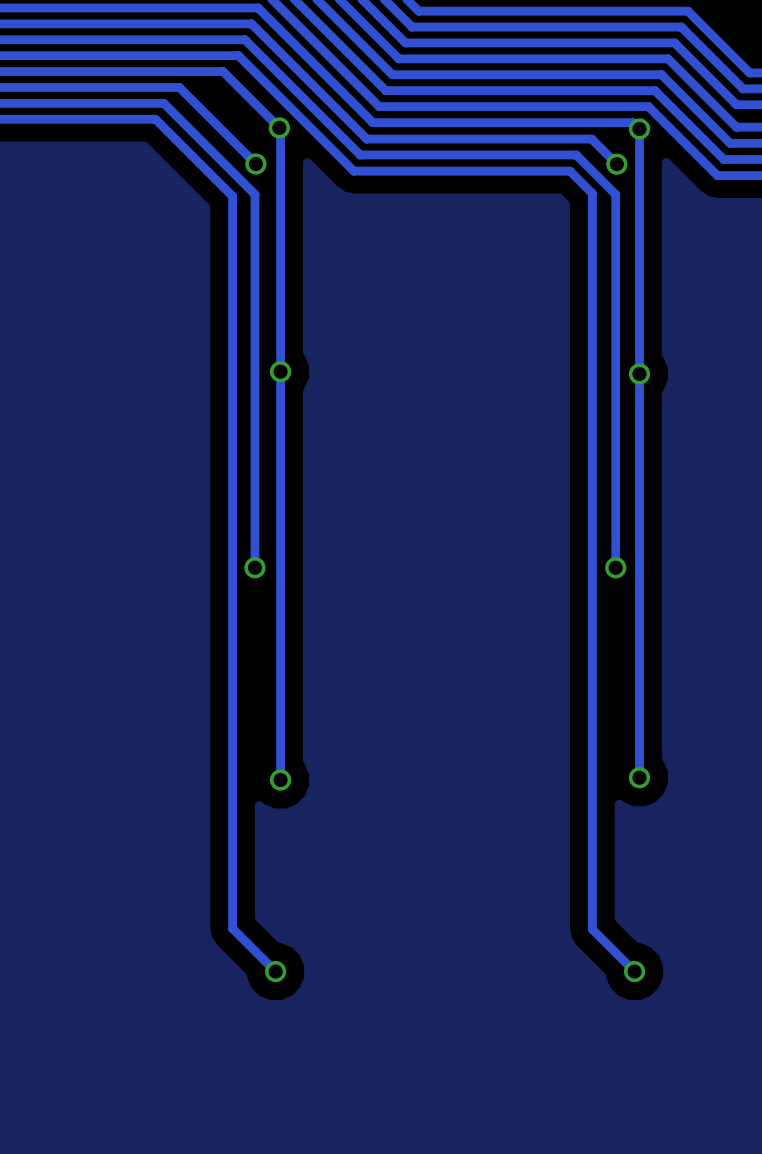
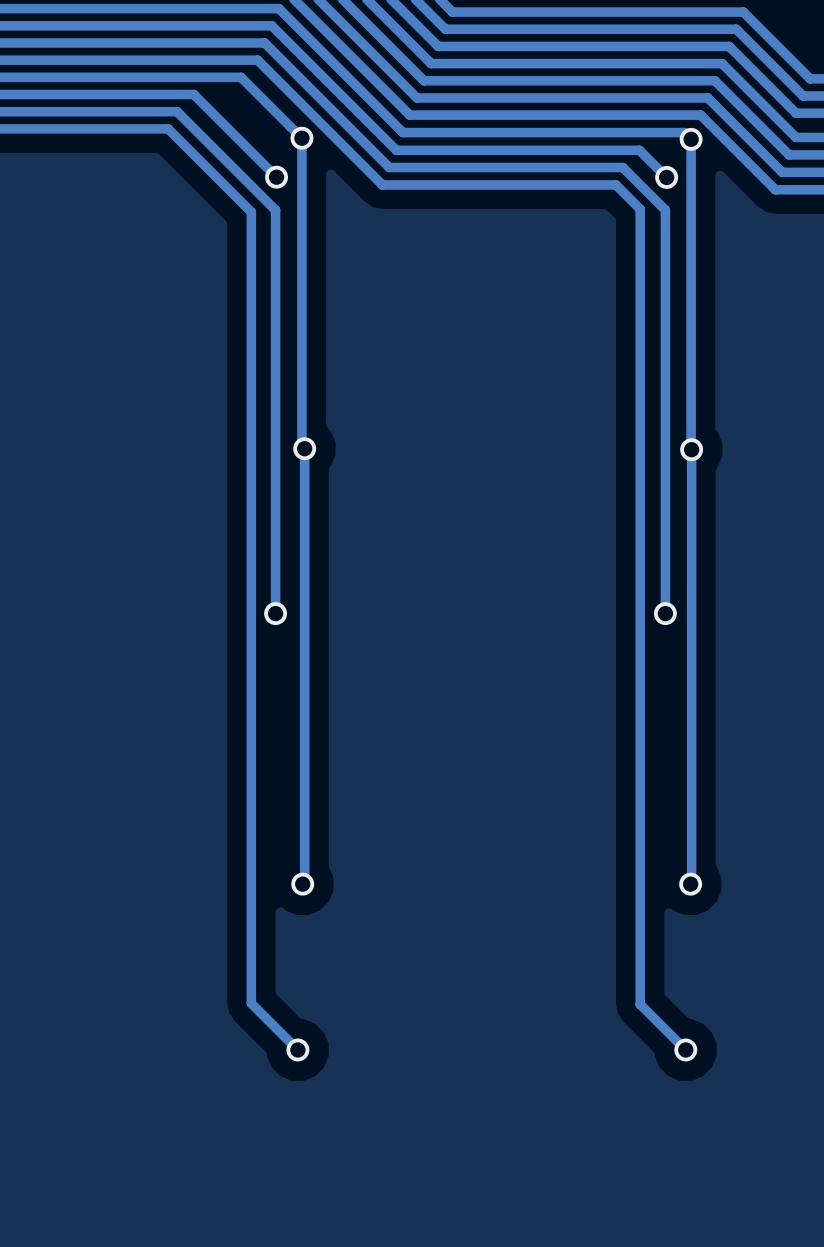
track: (279, 127) (280, 779) -> (301, 138) (301, 445) (304, 448) (304, 882) (302, 884)
via position: (280, 371) -> (304, 448)
via position: (639, 373) -> (691, 449)
track: (639, 415) (639, 777) -> (691, 449) (690, 884)
via position: (639, 777) -> (690, 884)
via position: (280, 779) -> (302, 884)

